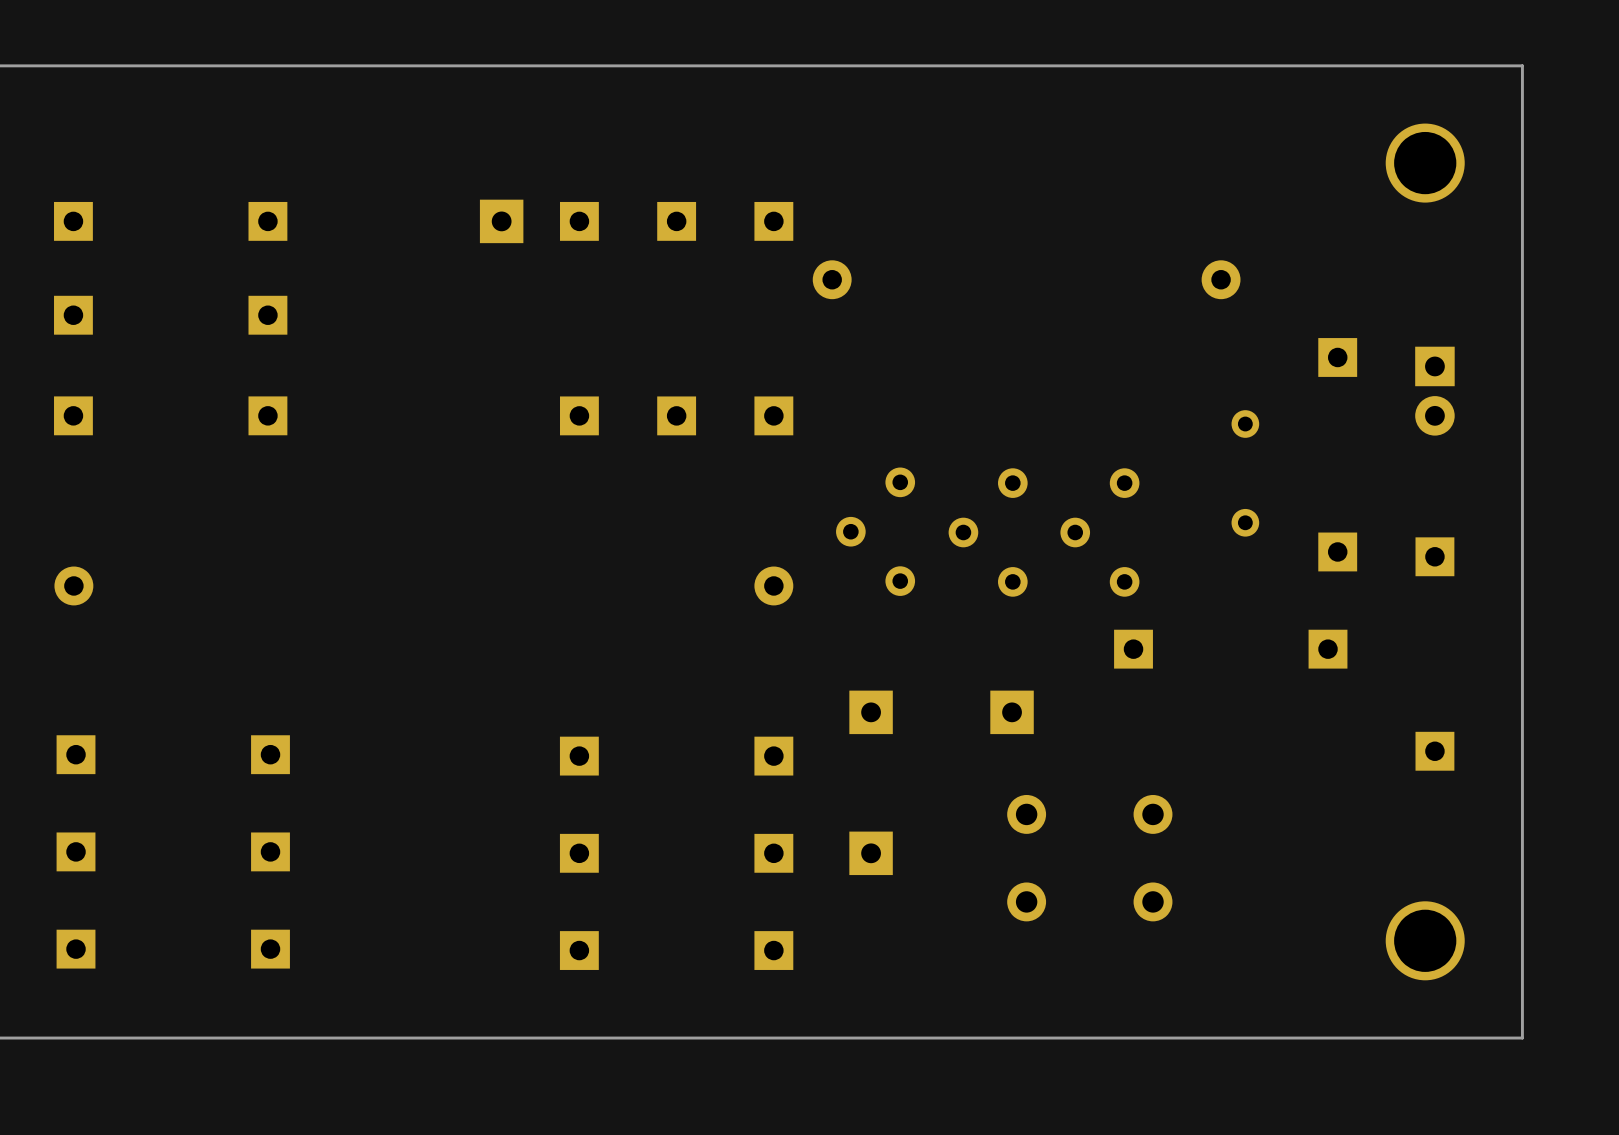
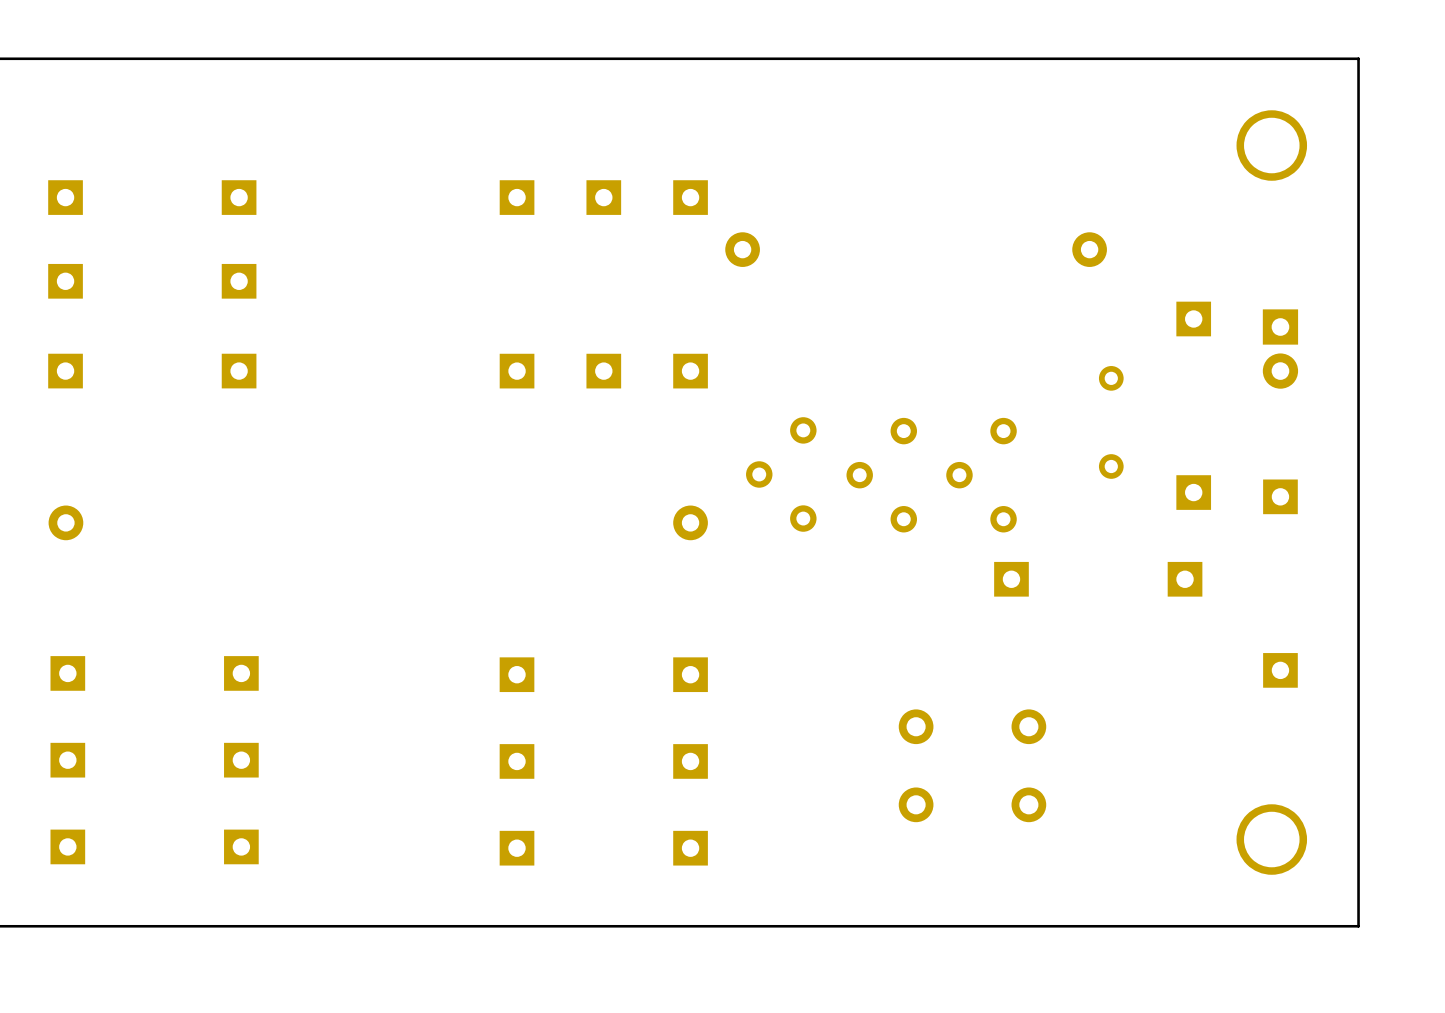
part: (501, 221) -> none
part: (871, 712) -> none
part: (1012, 712) -> none
part: (871, 853) -> none

